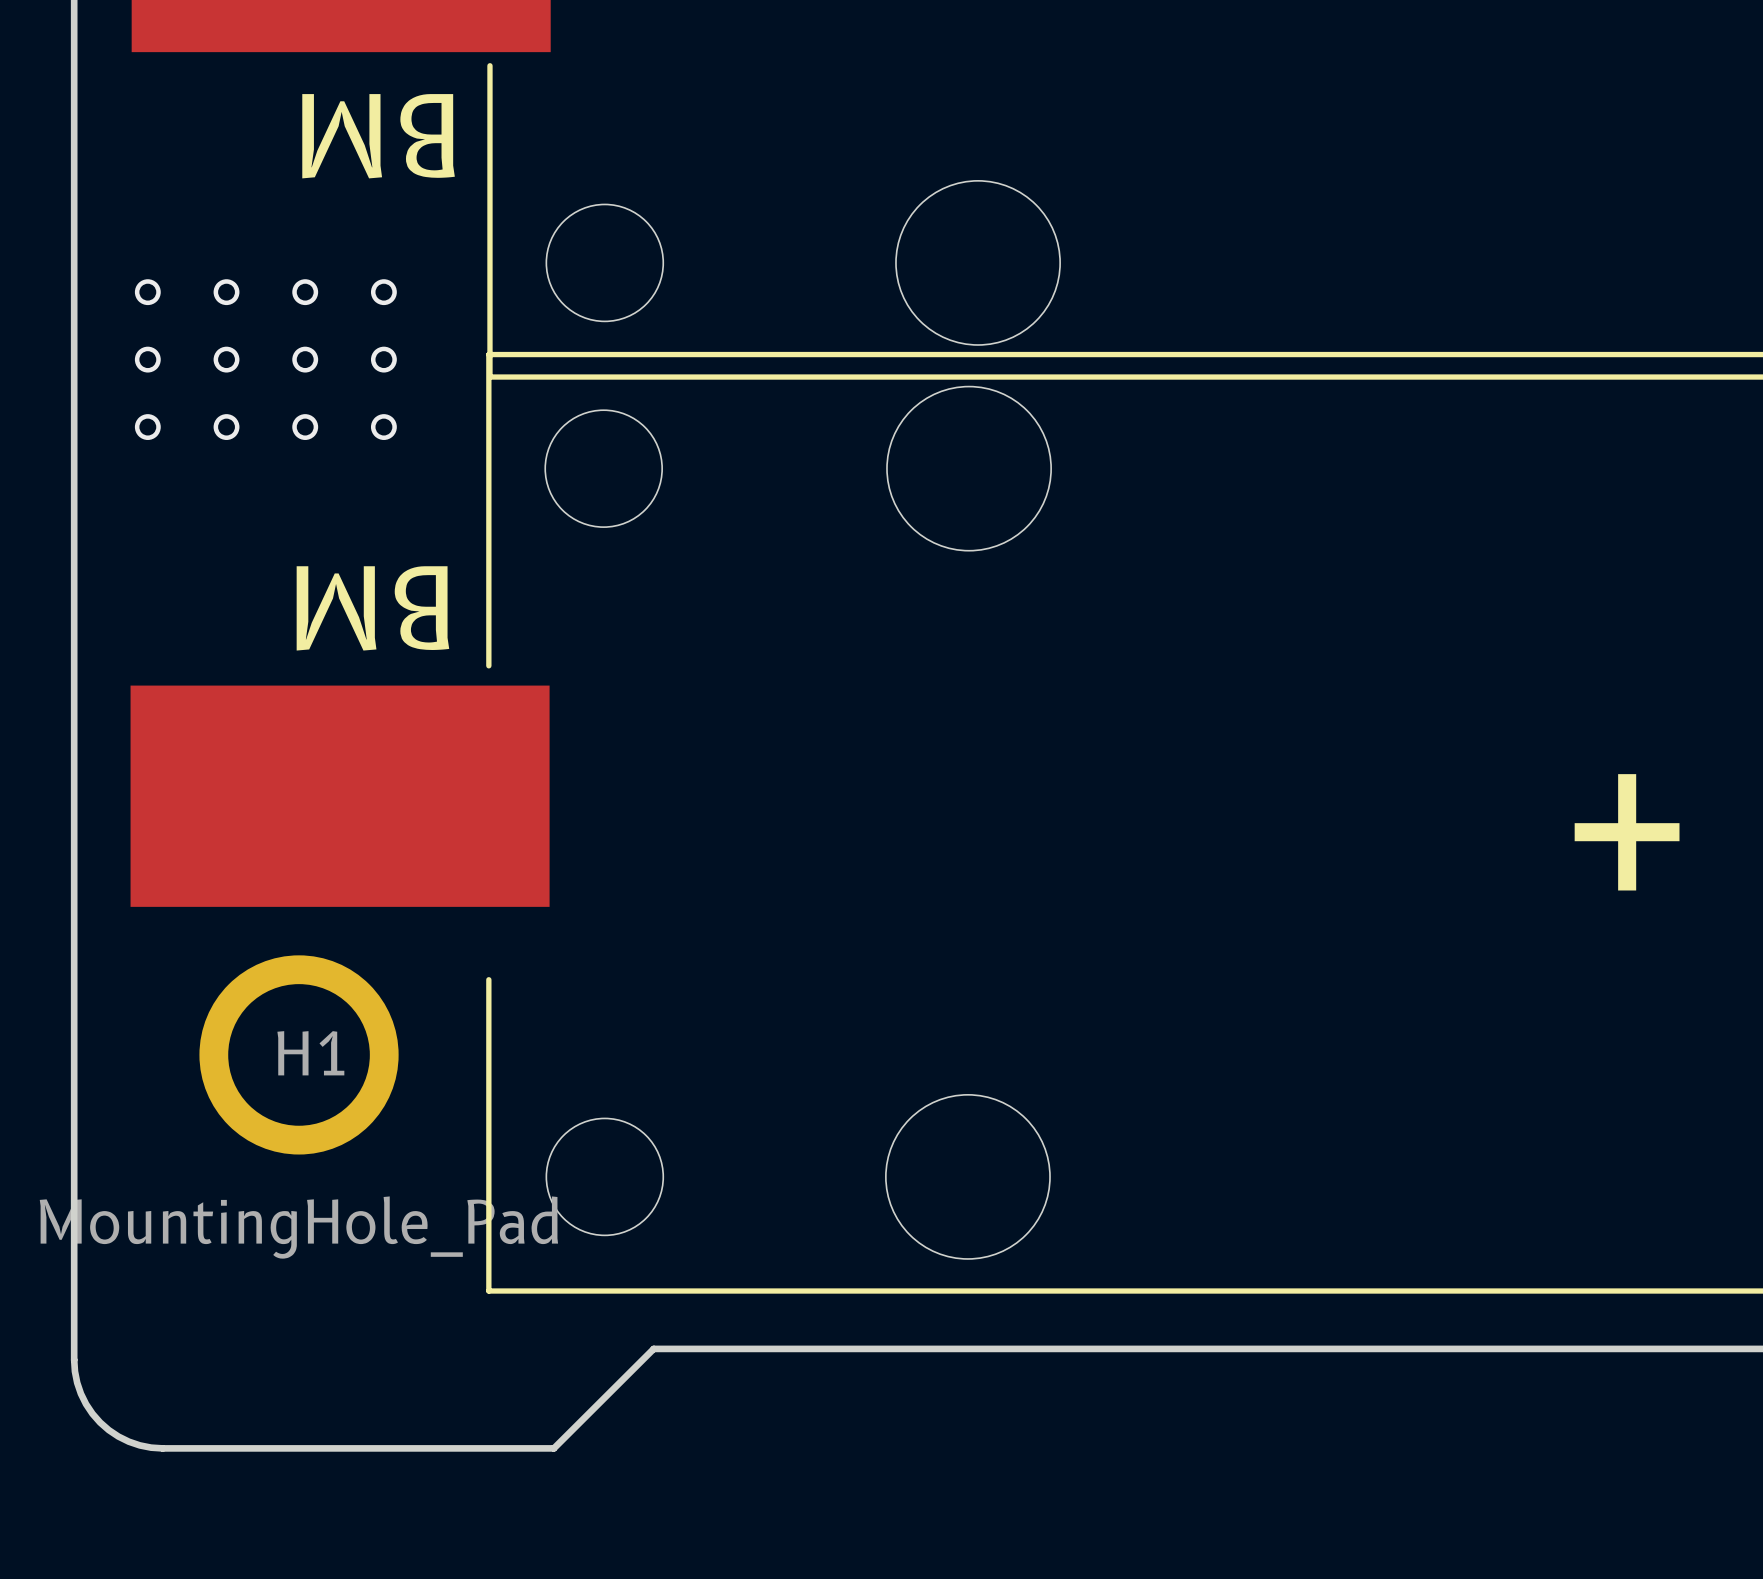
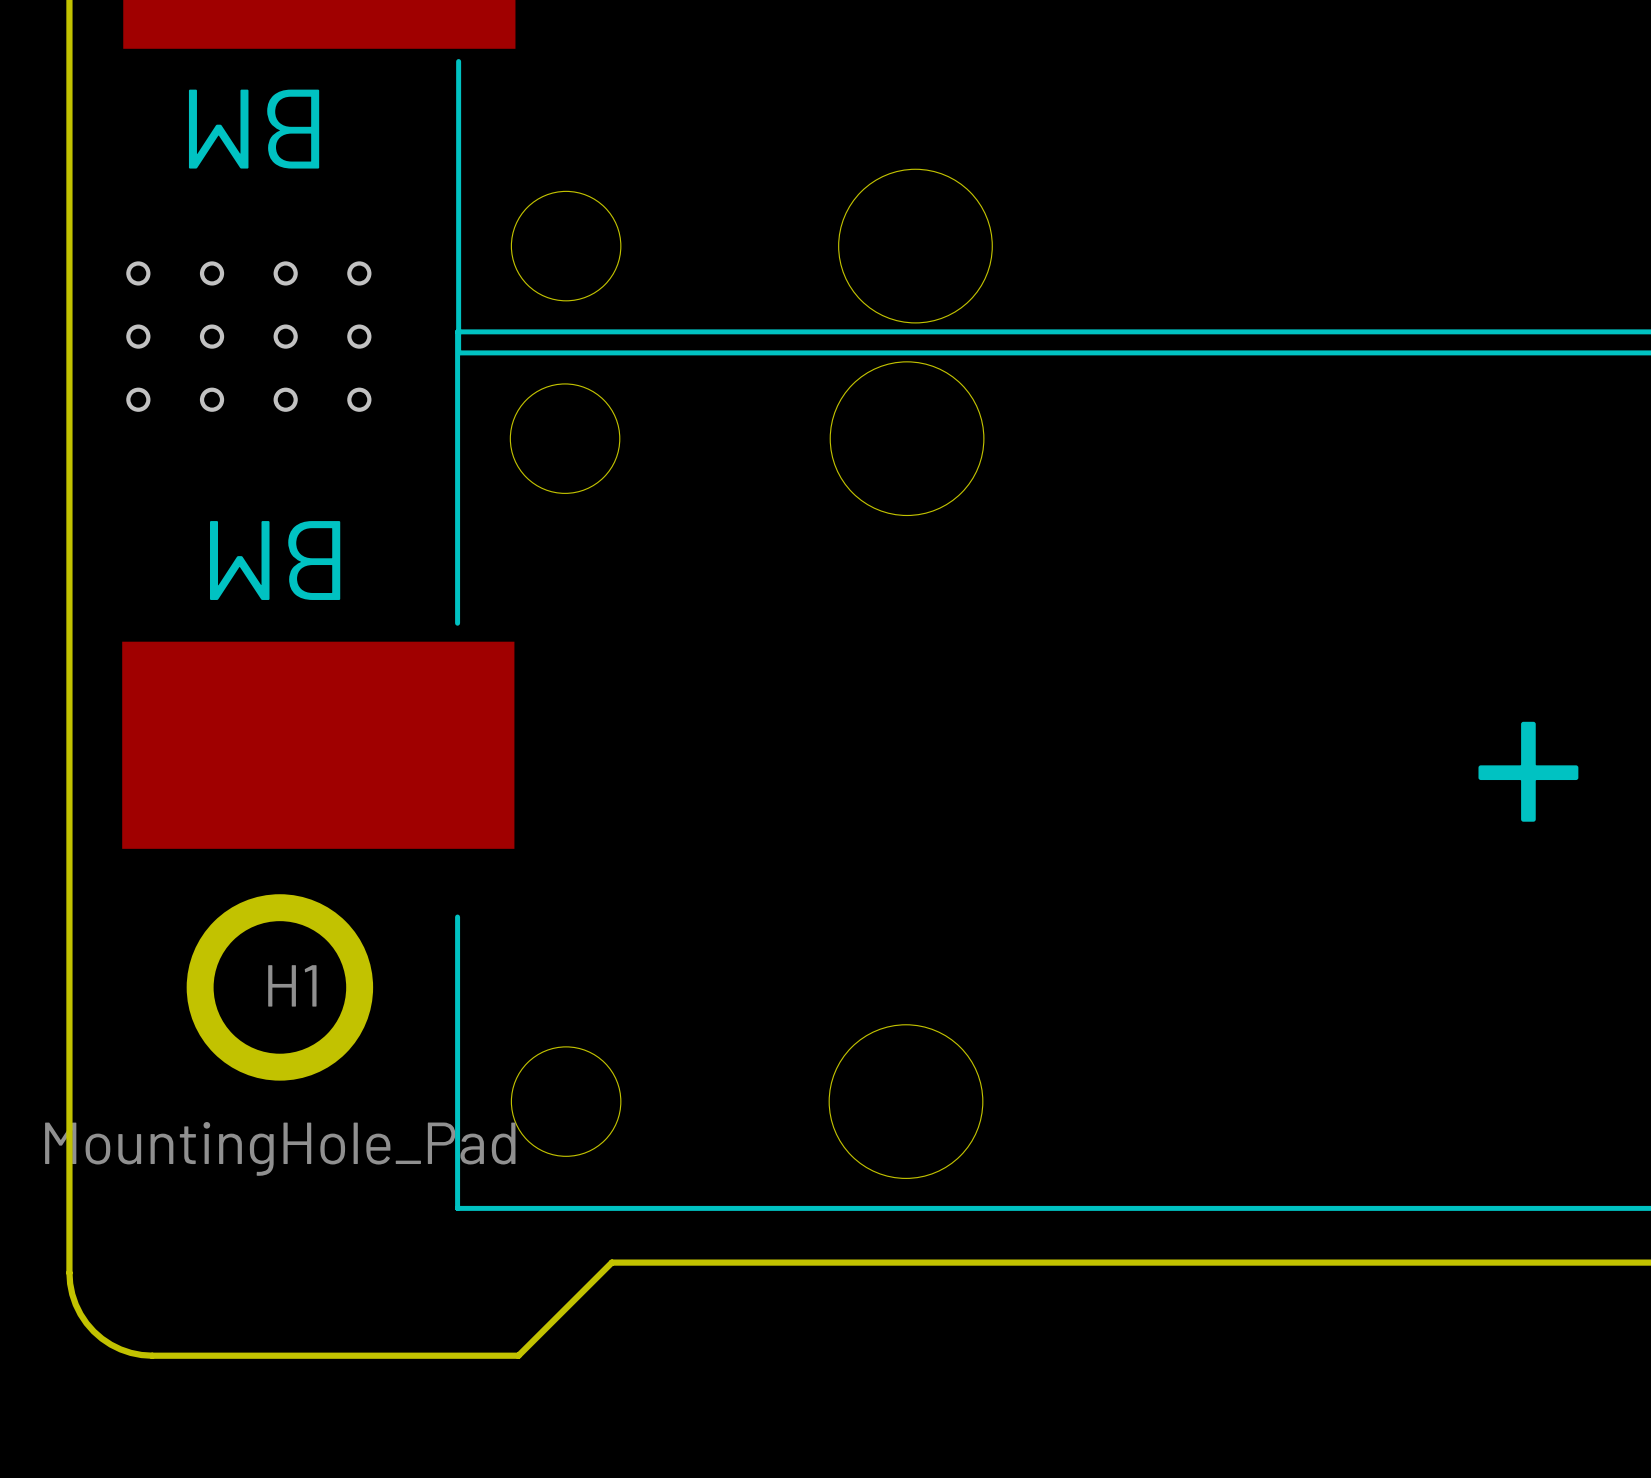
text position: BM (378, 136) -> BM (254, 129)
text position: BM (372, 608) -> BM (275, 560)

